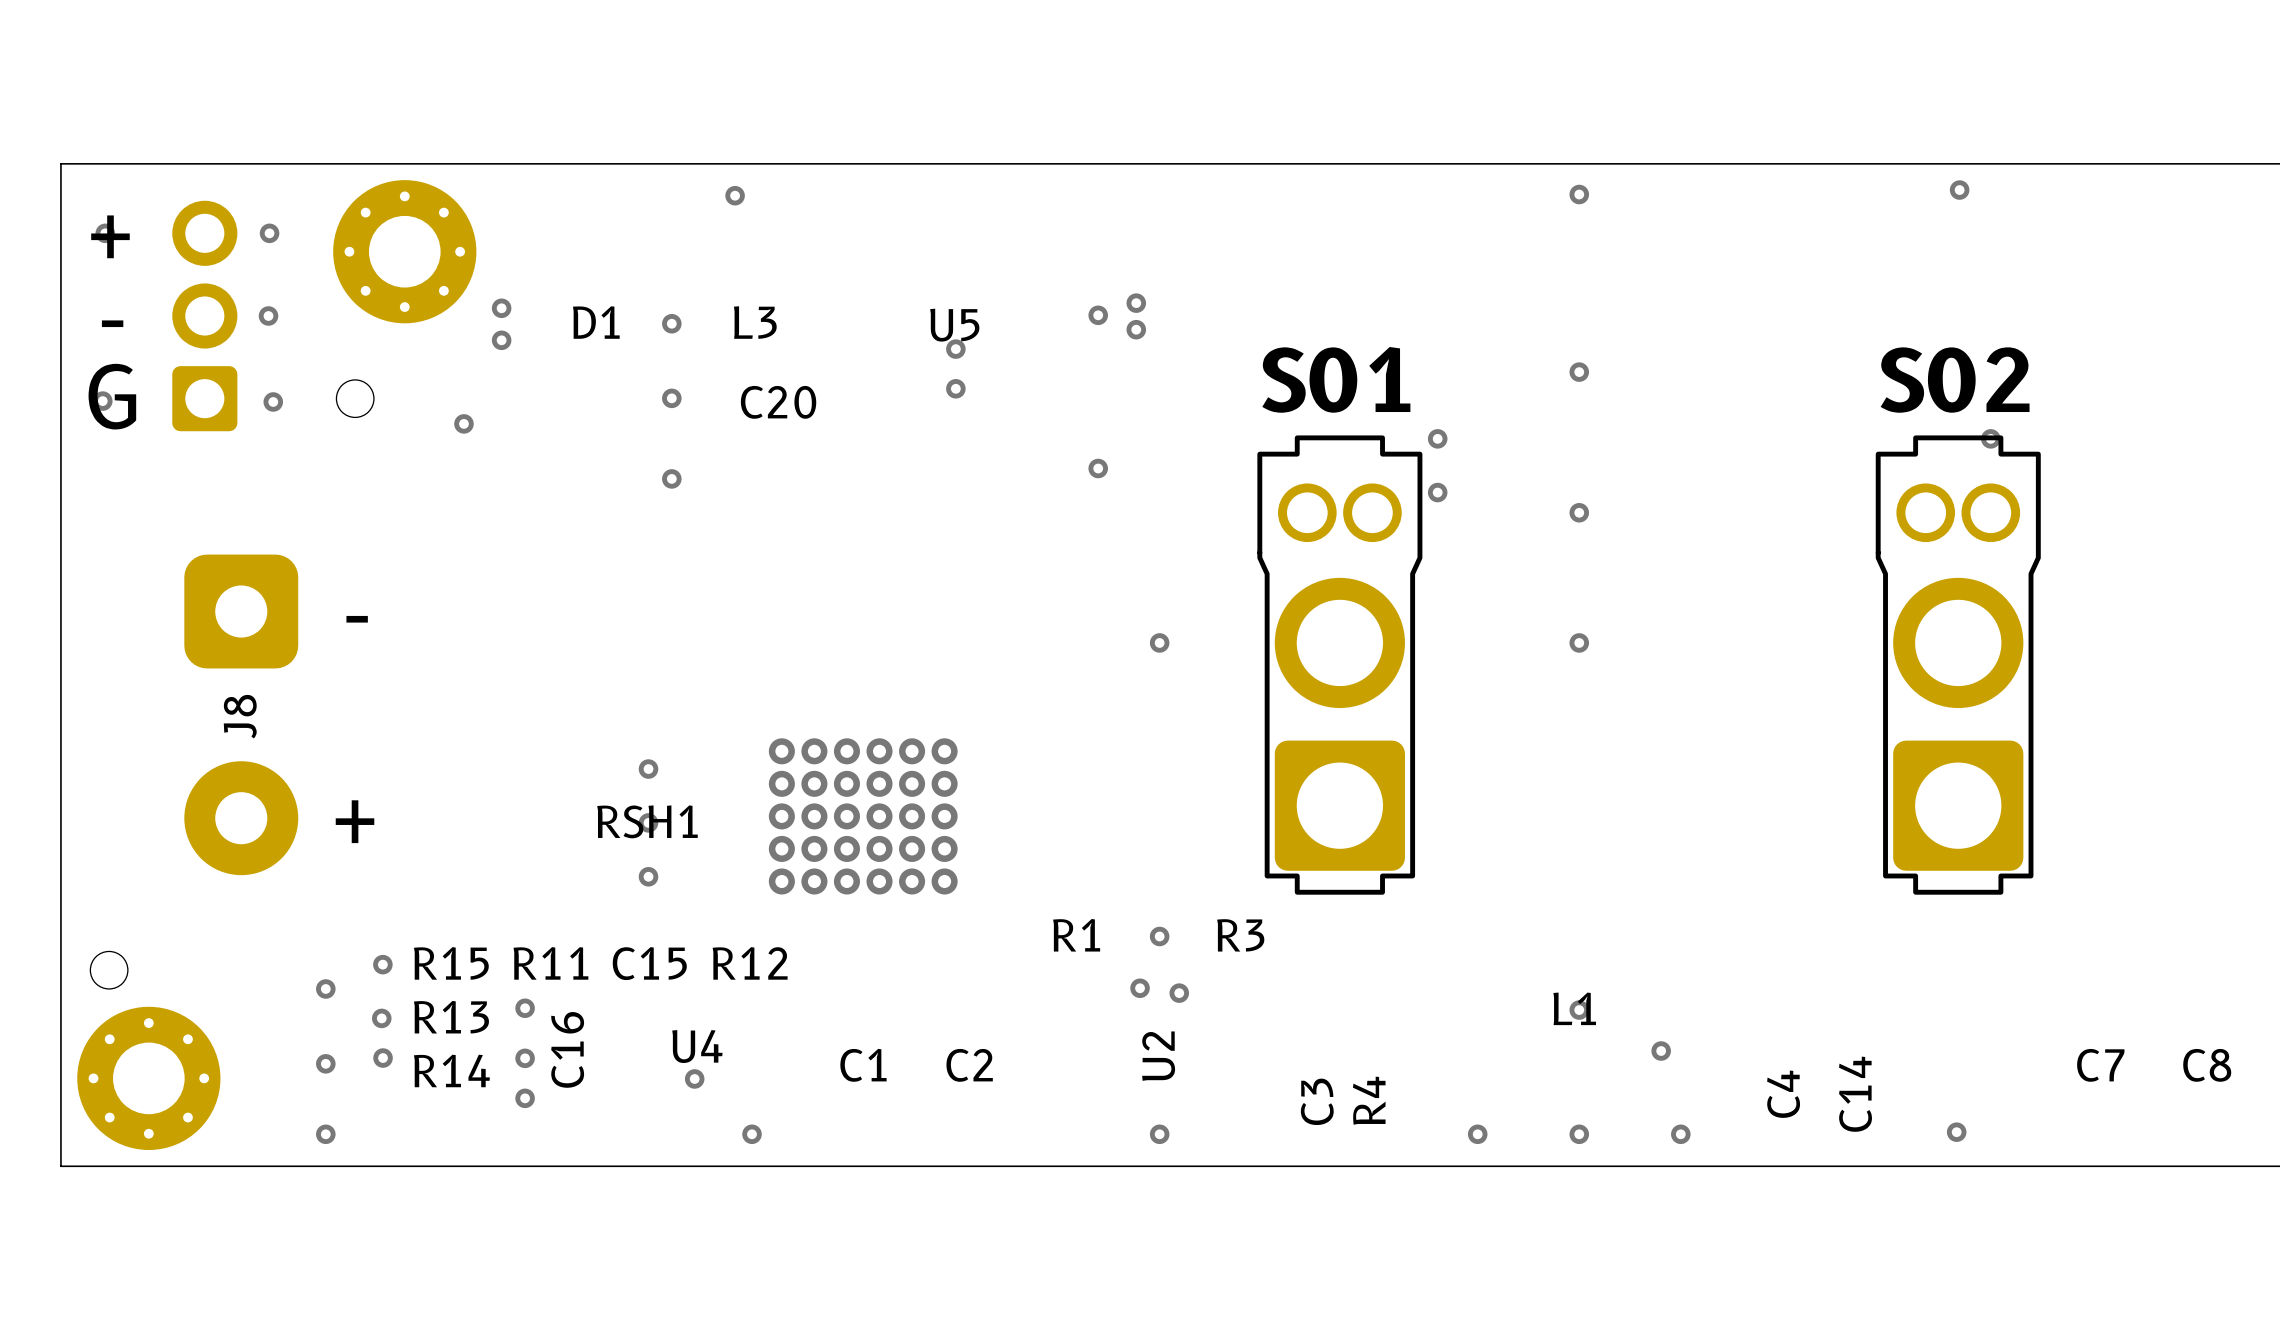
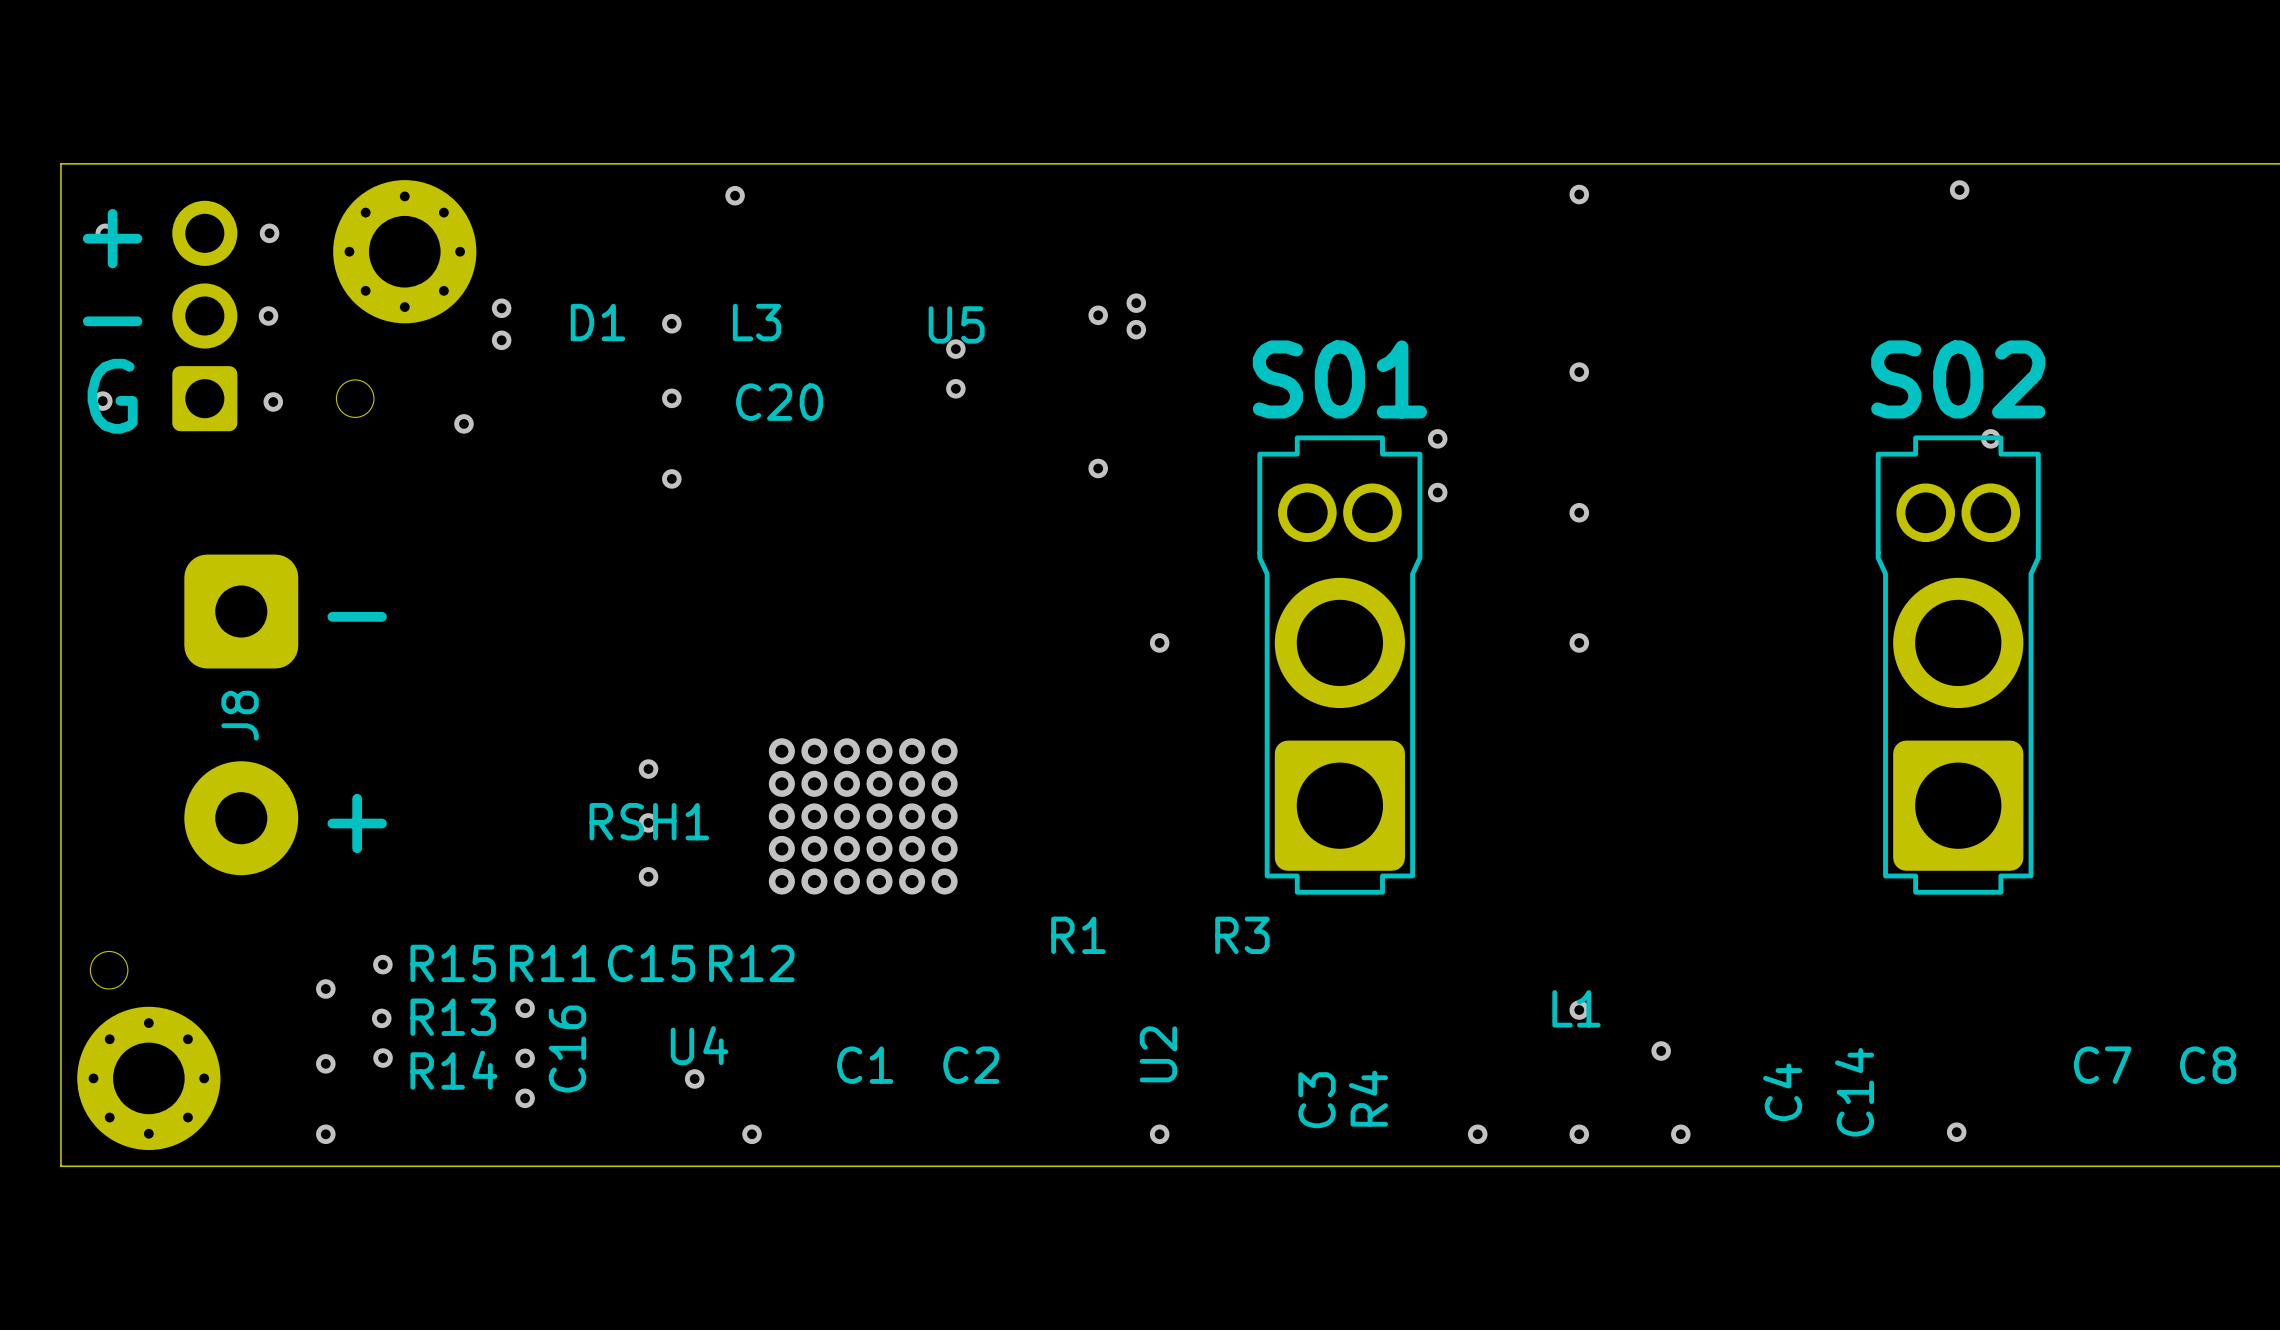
via: (1159, 936) -> none
via: (1140, 988) -> none
via: (1179, 993) -> none

